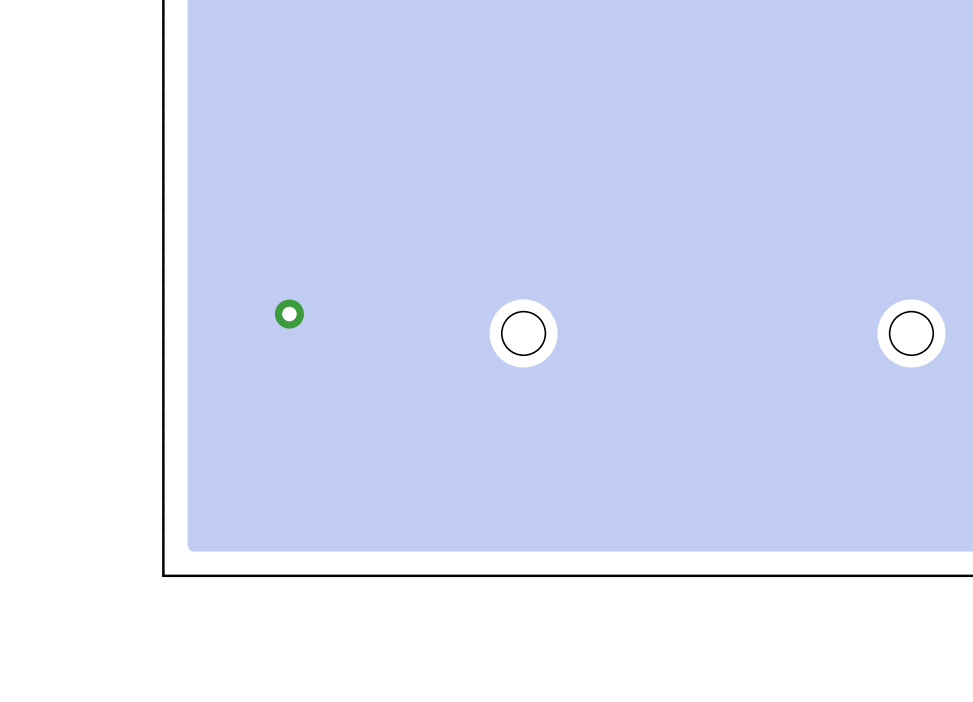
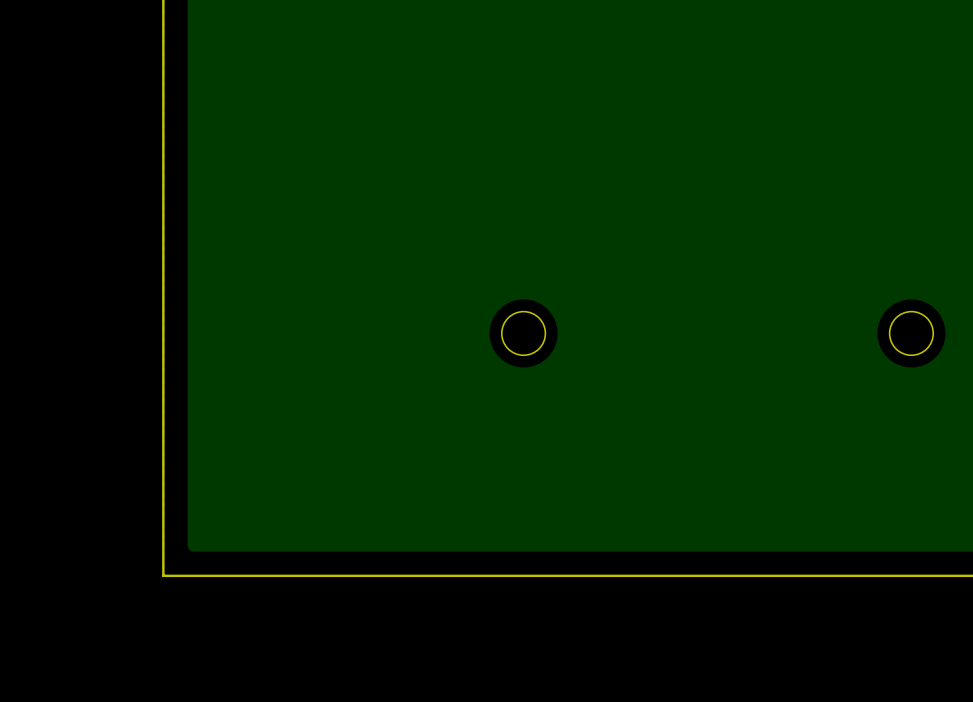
via: (289, 314) -> none

